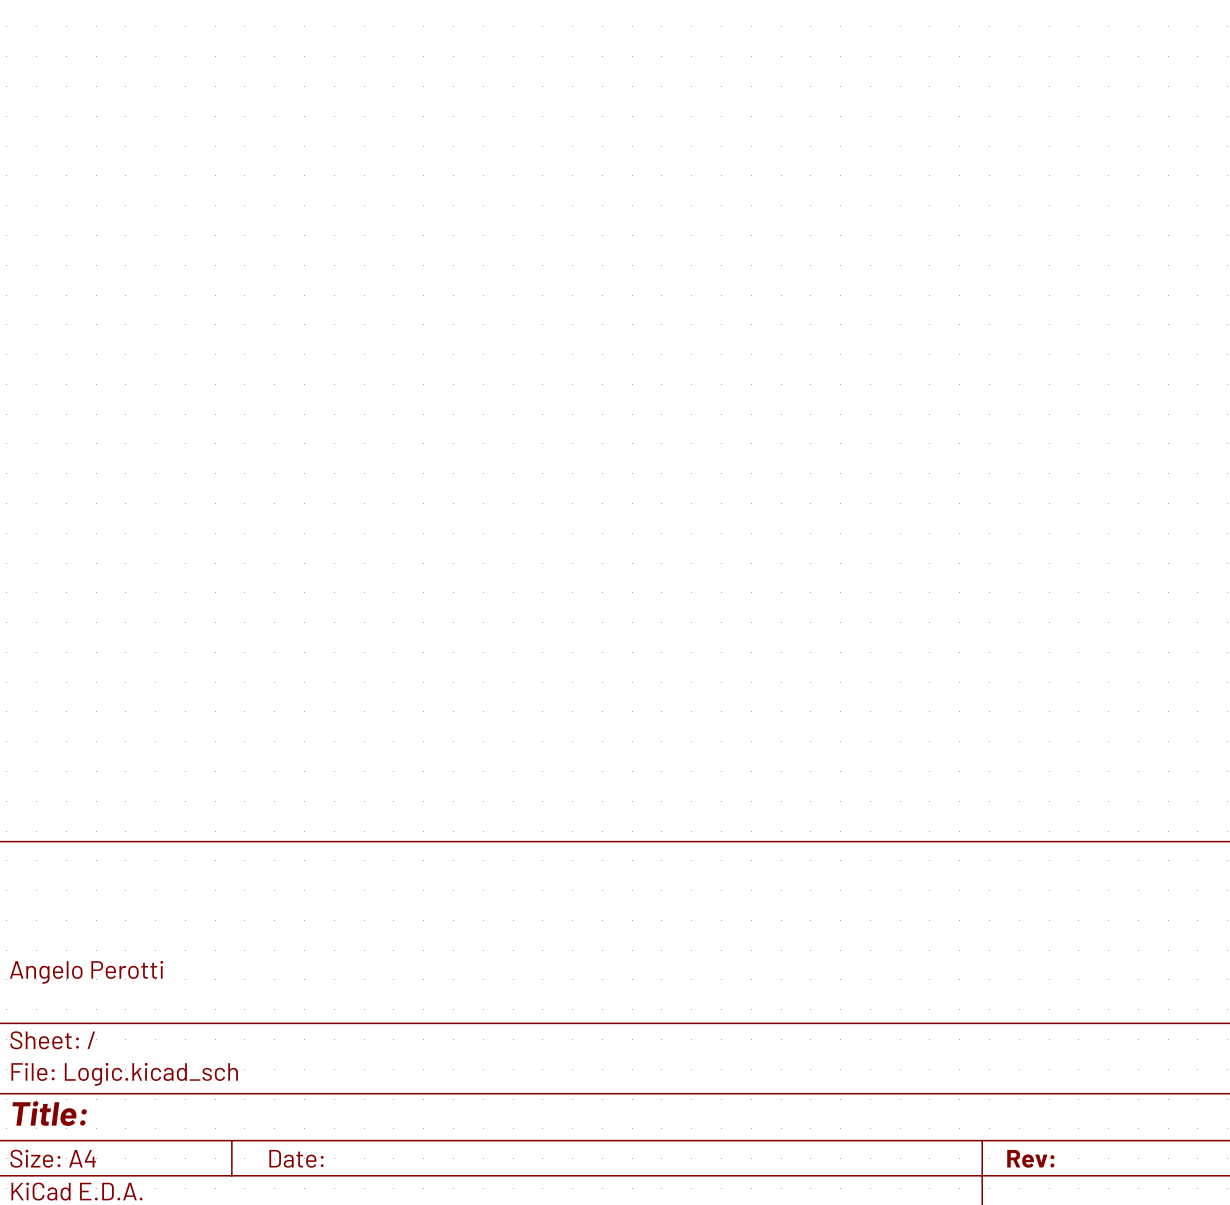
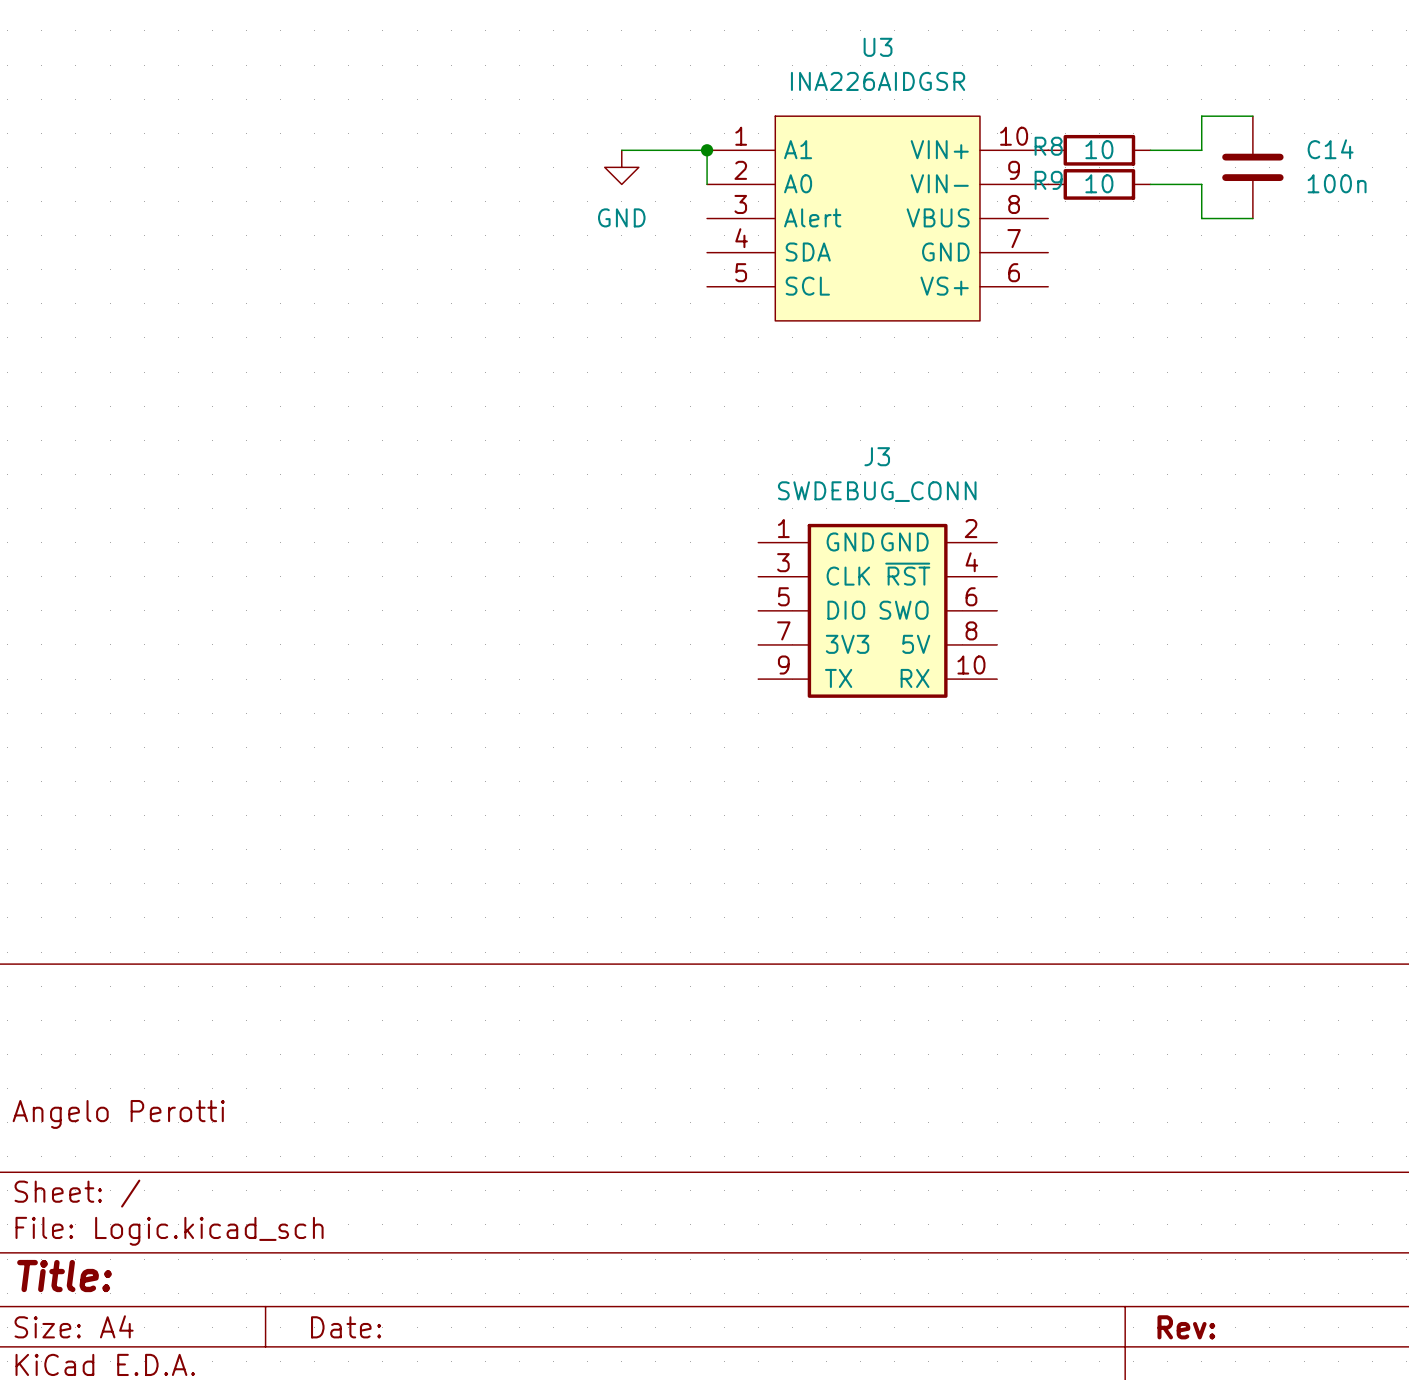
wire: none -> (1252, 116) (1201, 116) (1201, 150) (1150, 150)
wire: none -> (621, 150) (707, 150) (707, 184)
junction: none -> (707, 150)
R8: none -> 10 (1099, 150)
power symbol: none -> GND (621, 167)
C14: none -> 100n (1252, 167)
R9: none -> 10 (1099, 184)
wire: none -> (1150, 184) (1201, 184) (1201, 218) (1252, 218)
U3: none -> INA226AIDGSR (877, 218)
J3: none -> SWDEBUG_CONN (877, 610)

